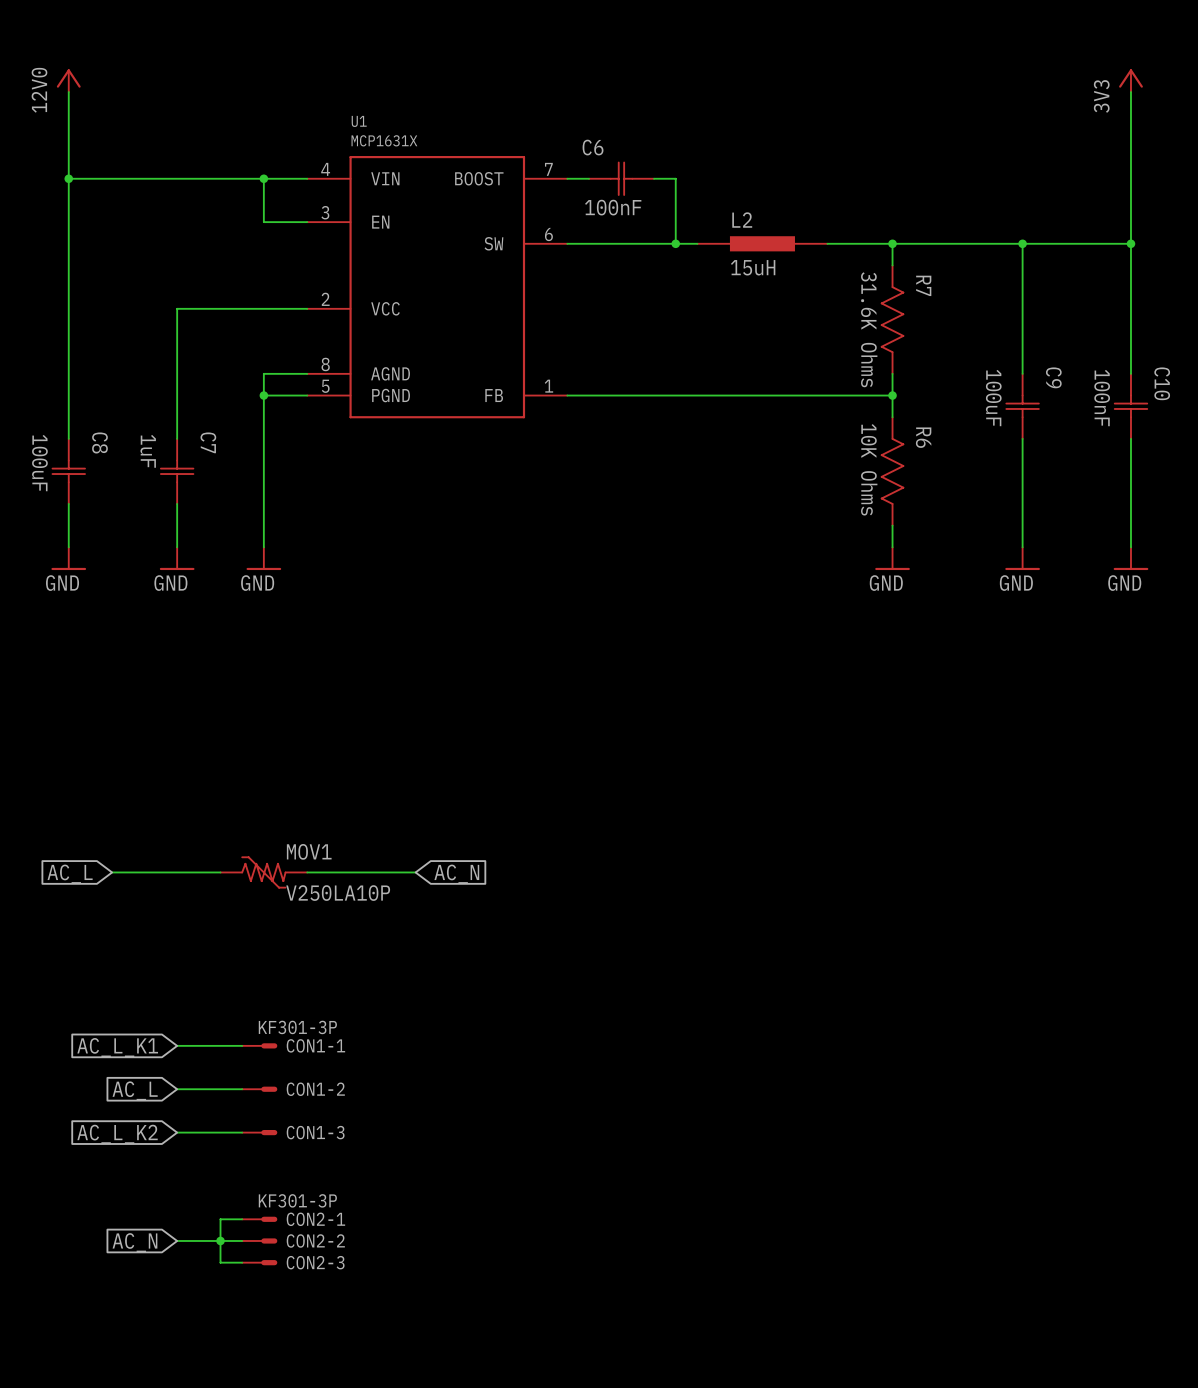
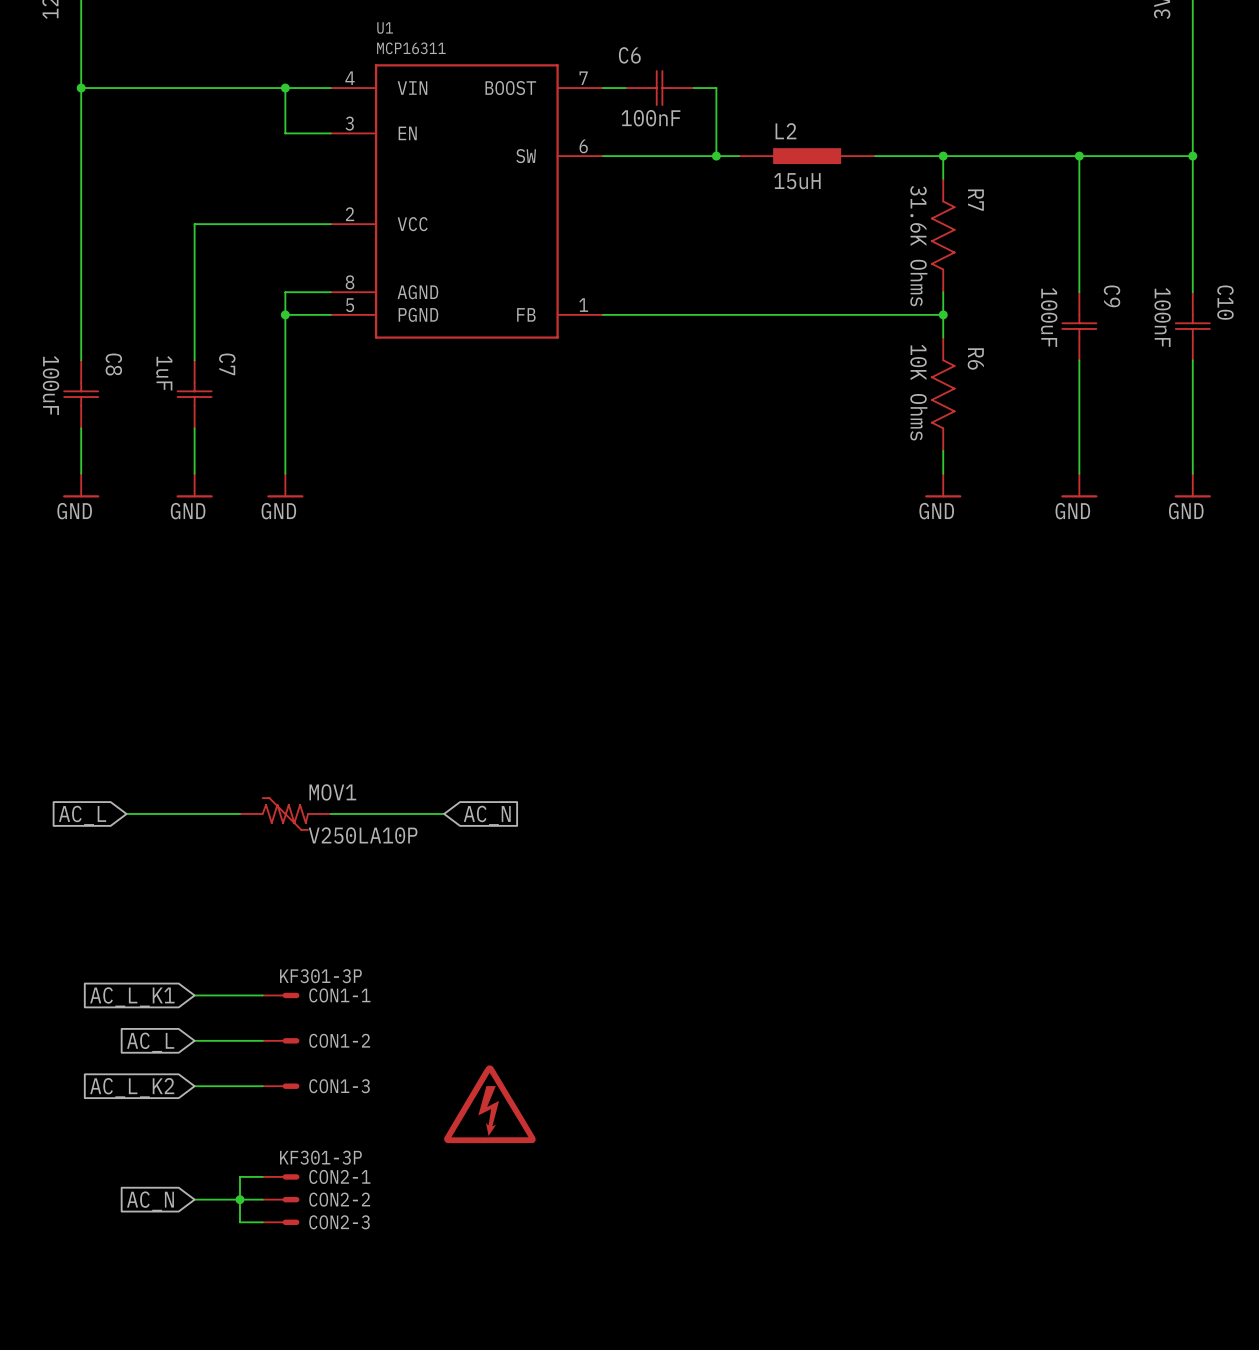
U1 value: MCP1631X (384, 140) -> MCP16311 (411, 48)
part: none -> (489, 1104)

